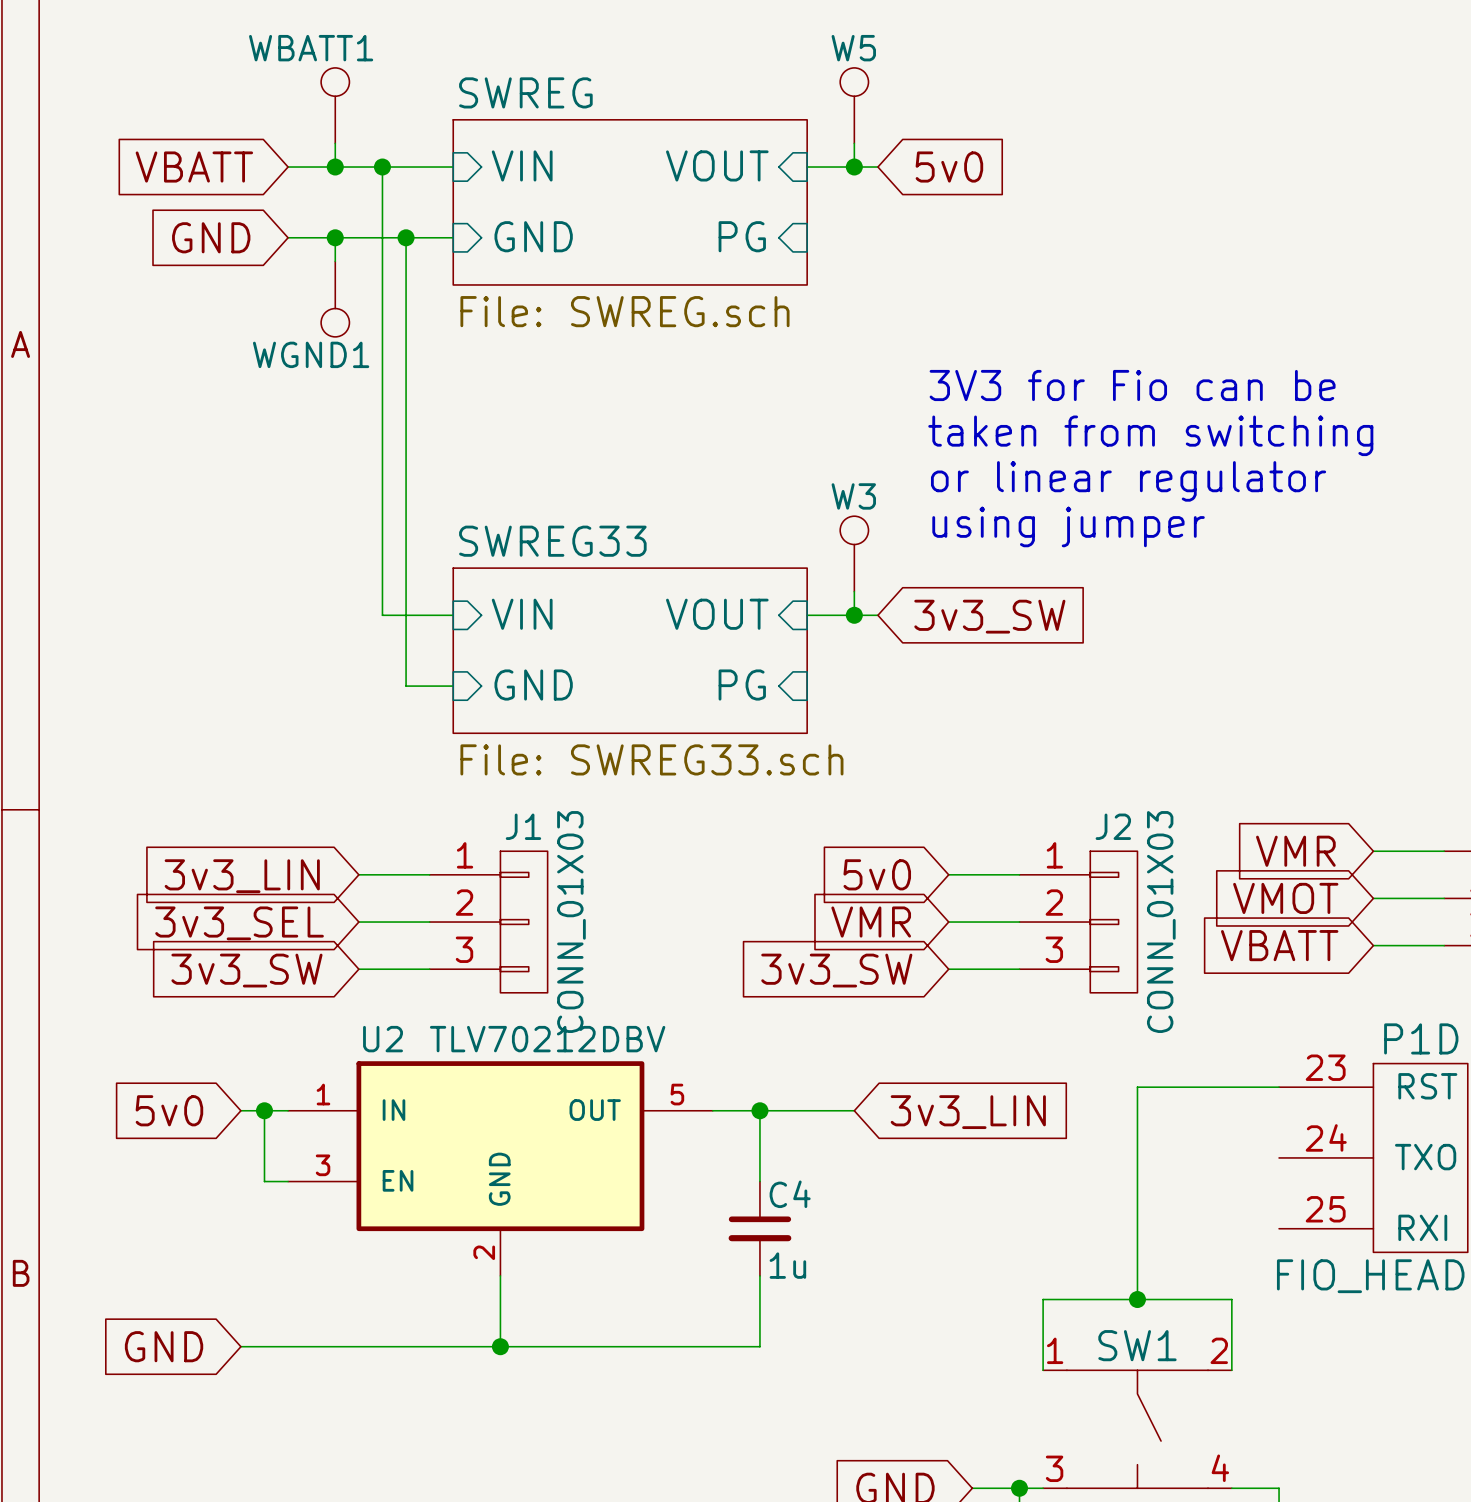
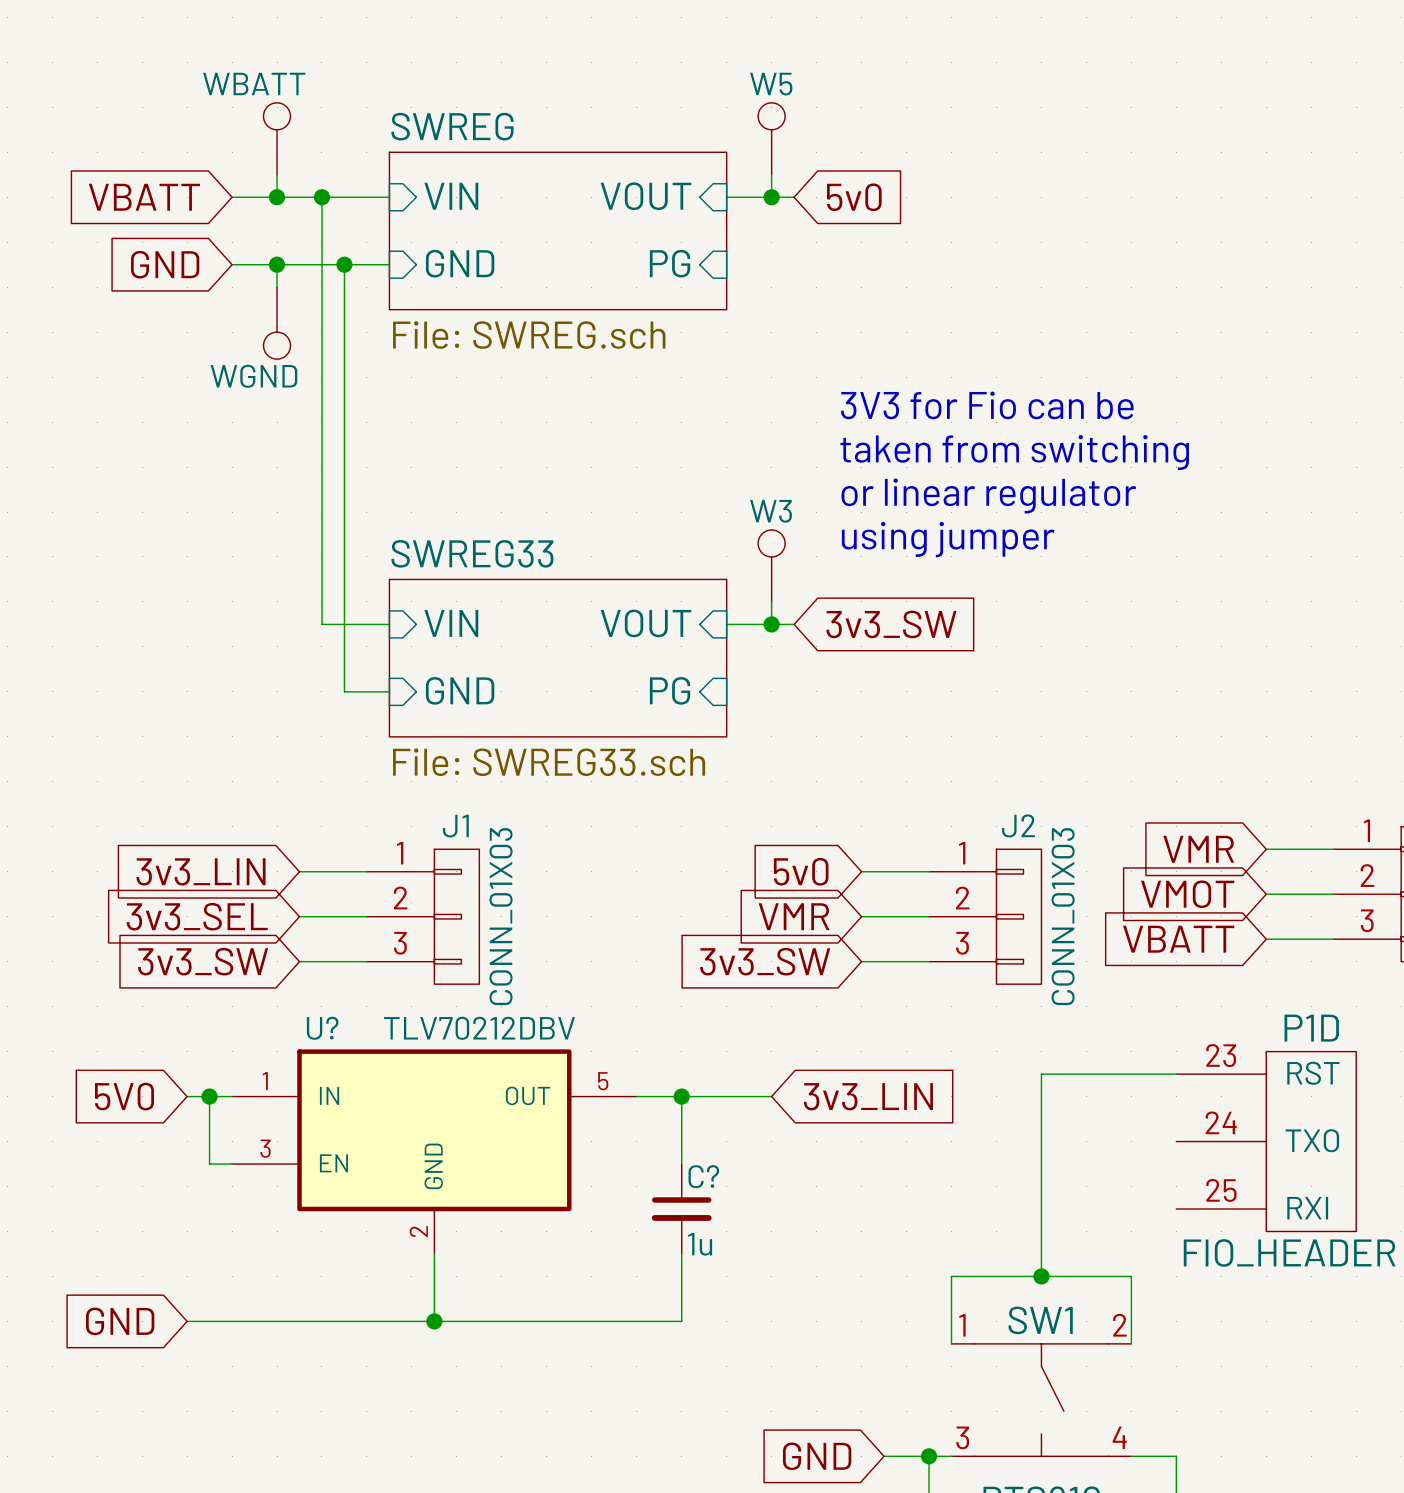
WBATT1 name: WBATT1 (311, 48) -> WBATT (254, 83)
WGND1 name: WGND1 (311, 354) -> WGND (253, 376)
U2 name: U2 (383, 1039) -> U? (322, 1028)
global label: 5v0 (169, 1110) -> 5V0 (124, 1096)
C4 name: C4 (790, 1194) -> C? (703, 1176)

